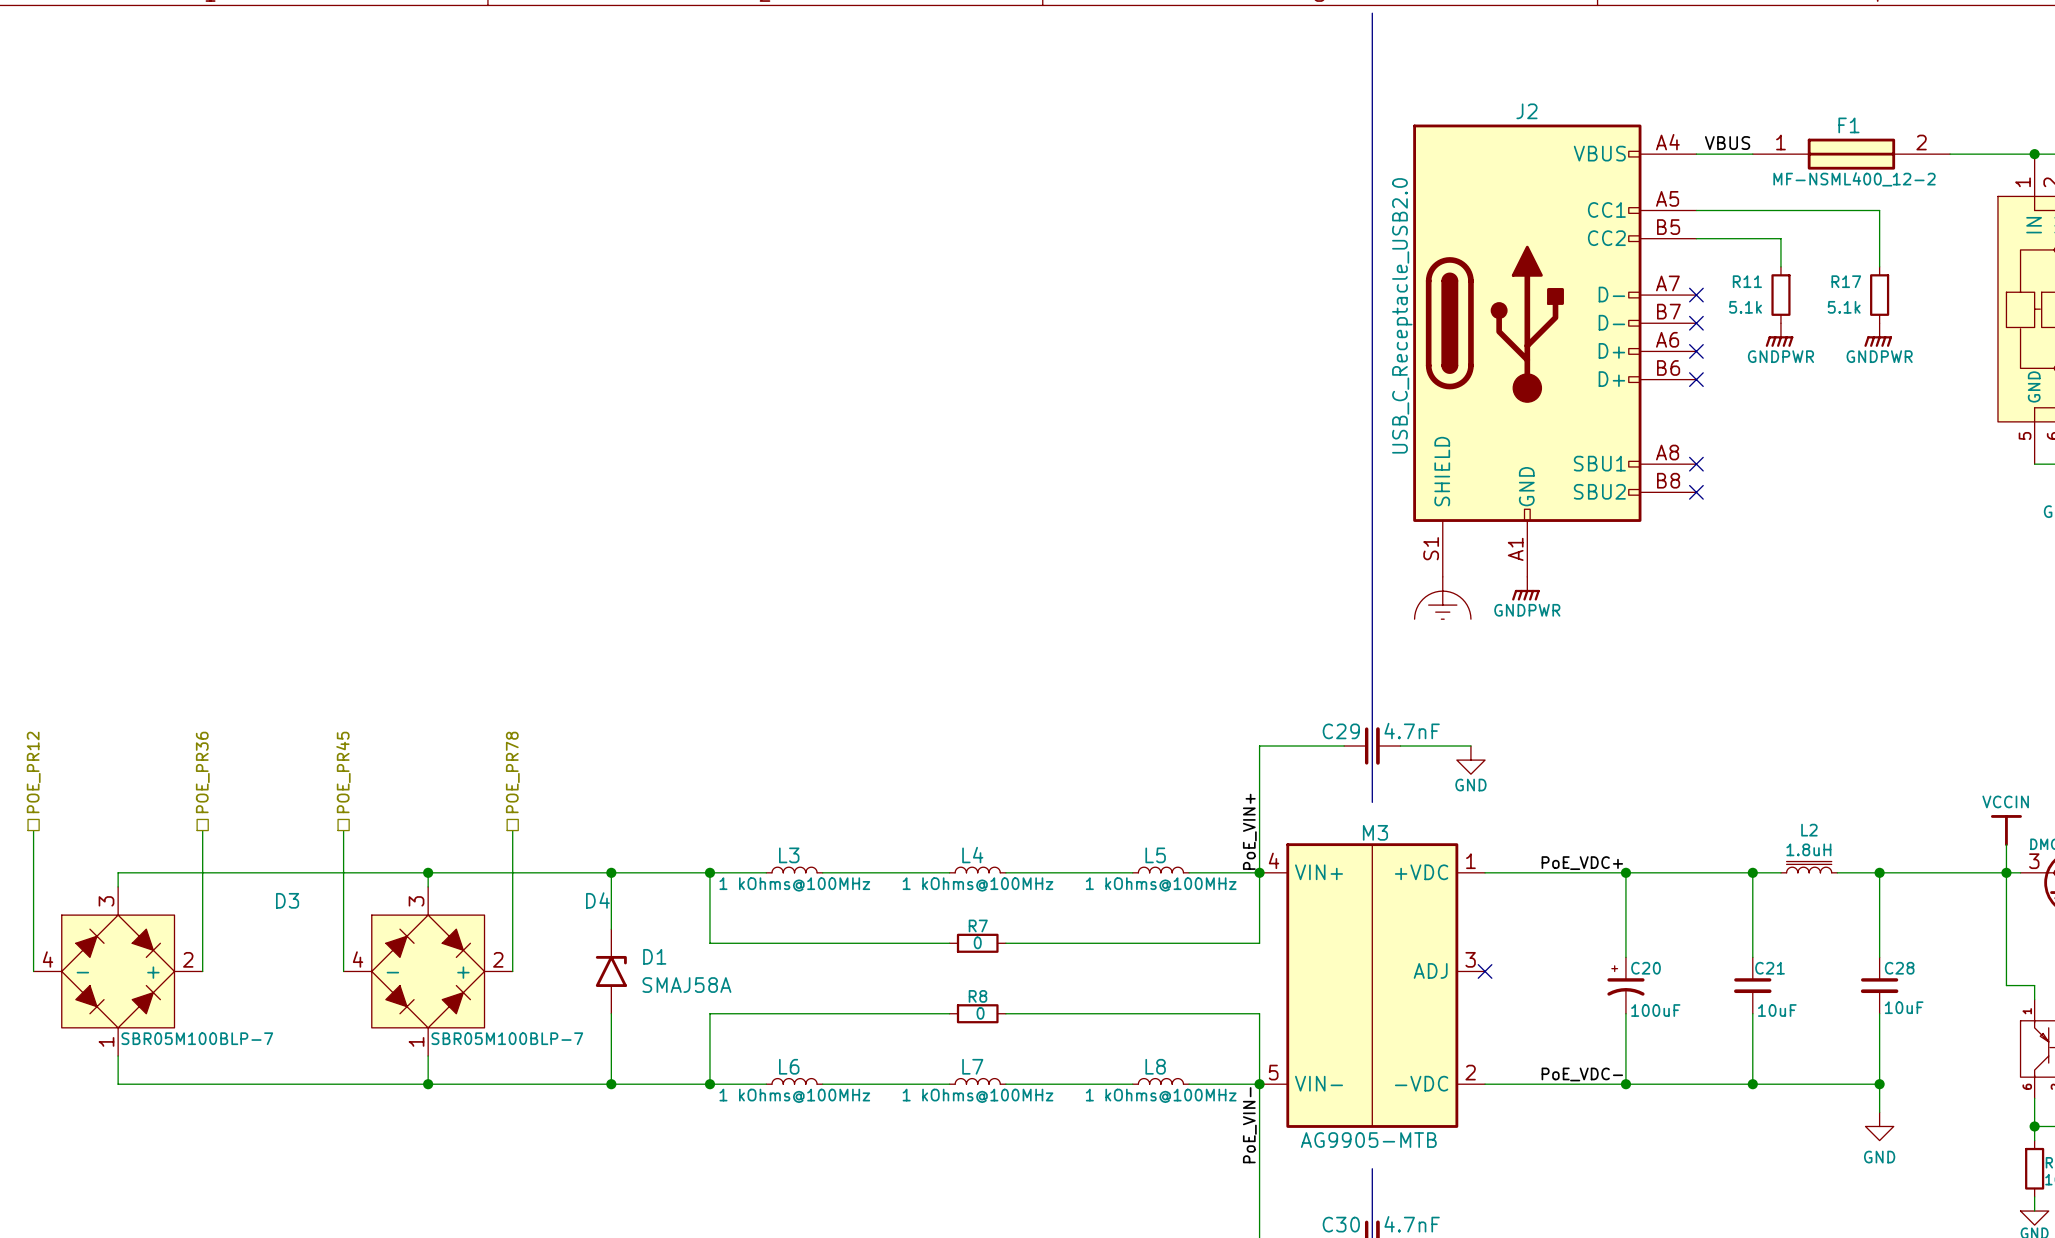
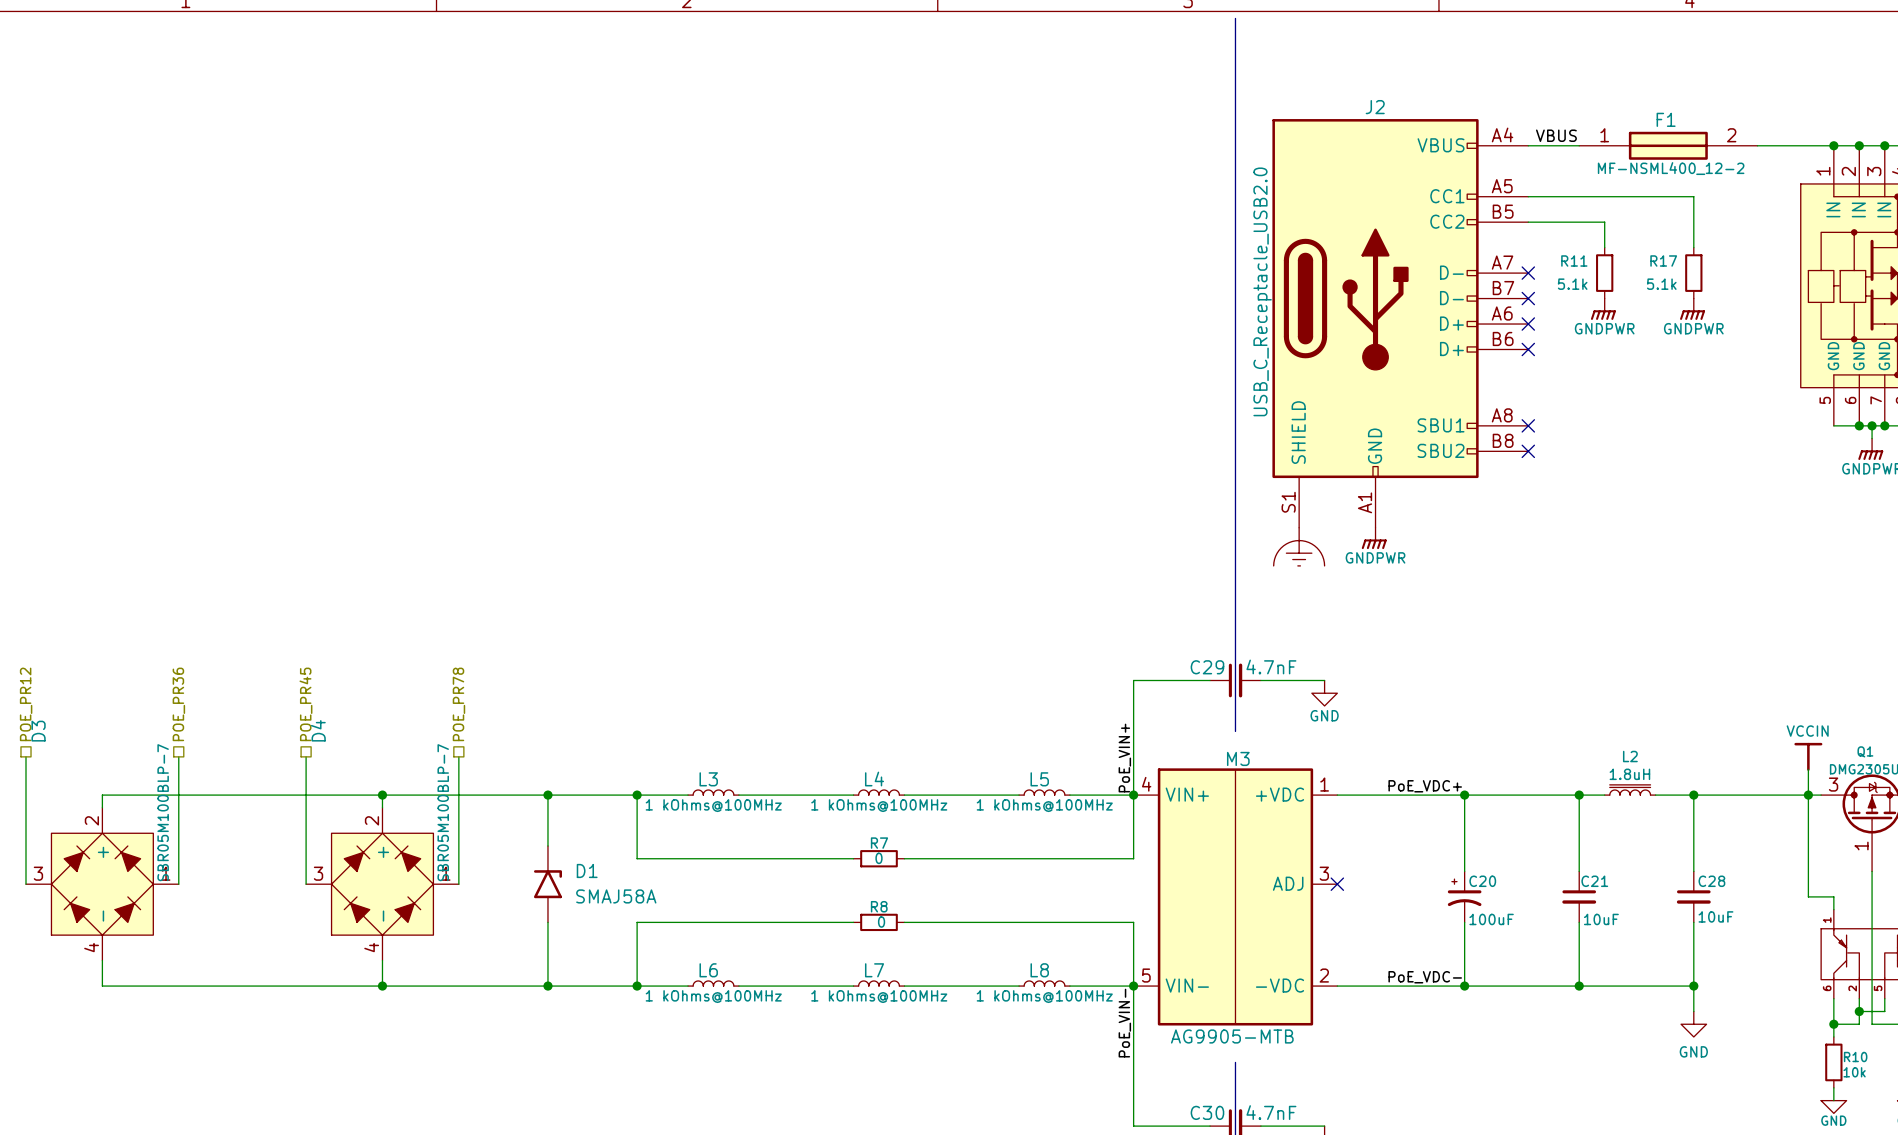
D3 rotation: 0° (118, 971) -> 90° counterclockwise (102, 884)
D4 rotation: 0° (428, 971) -> 90° counterclockwise (382, 884)

